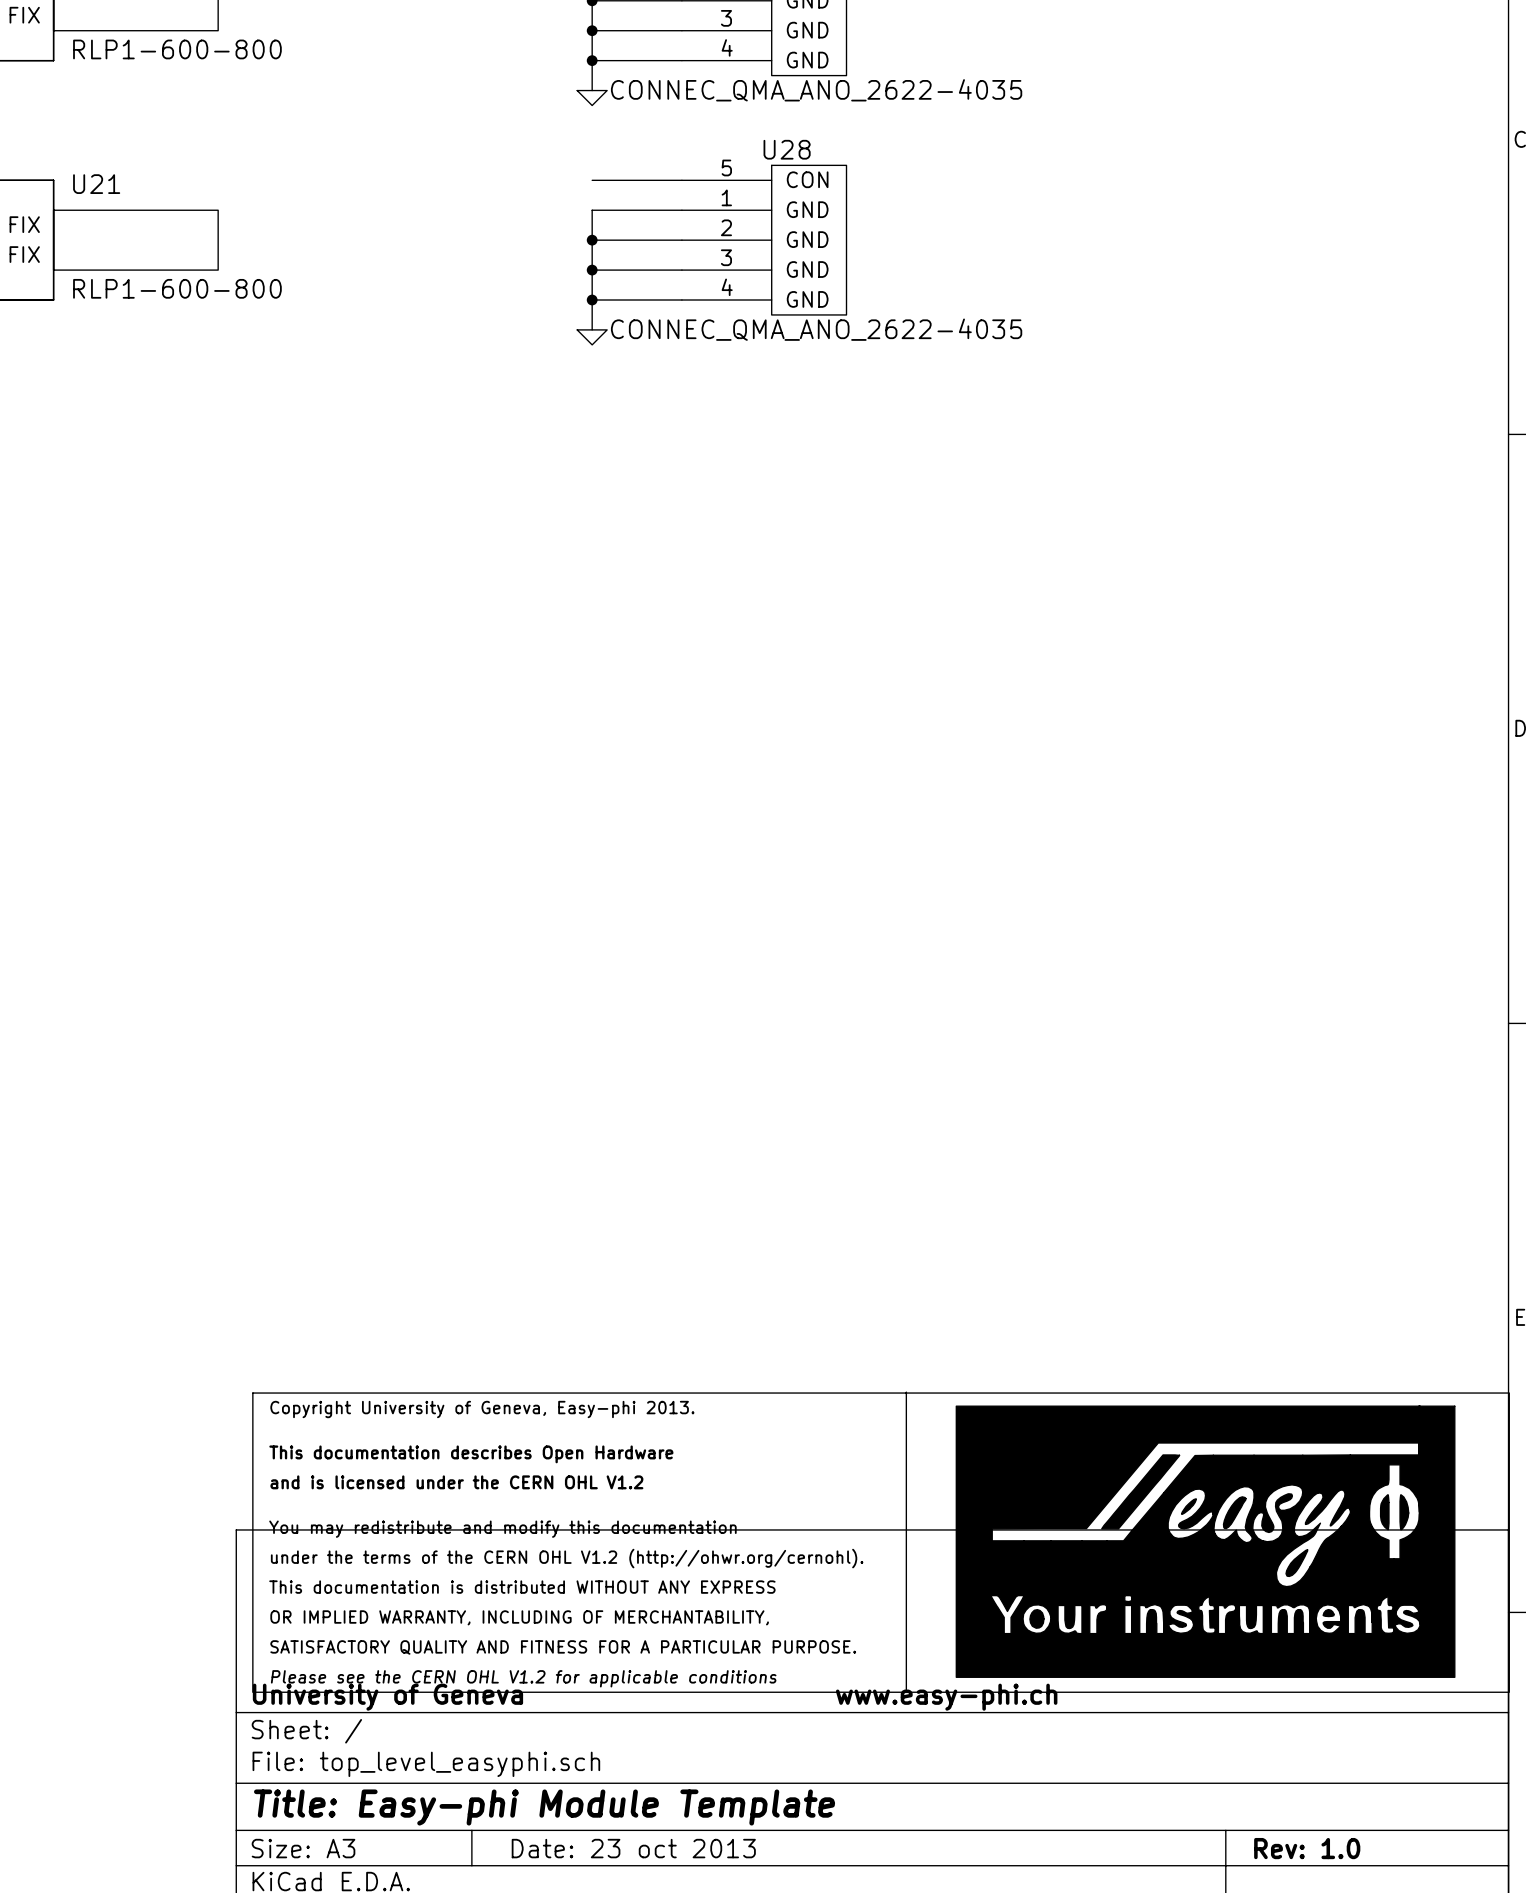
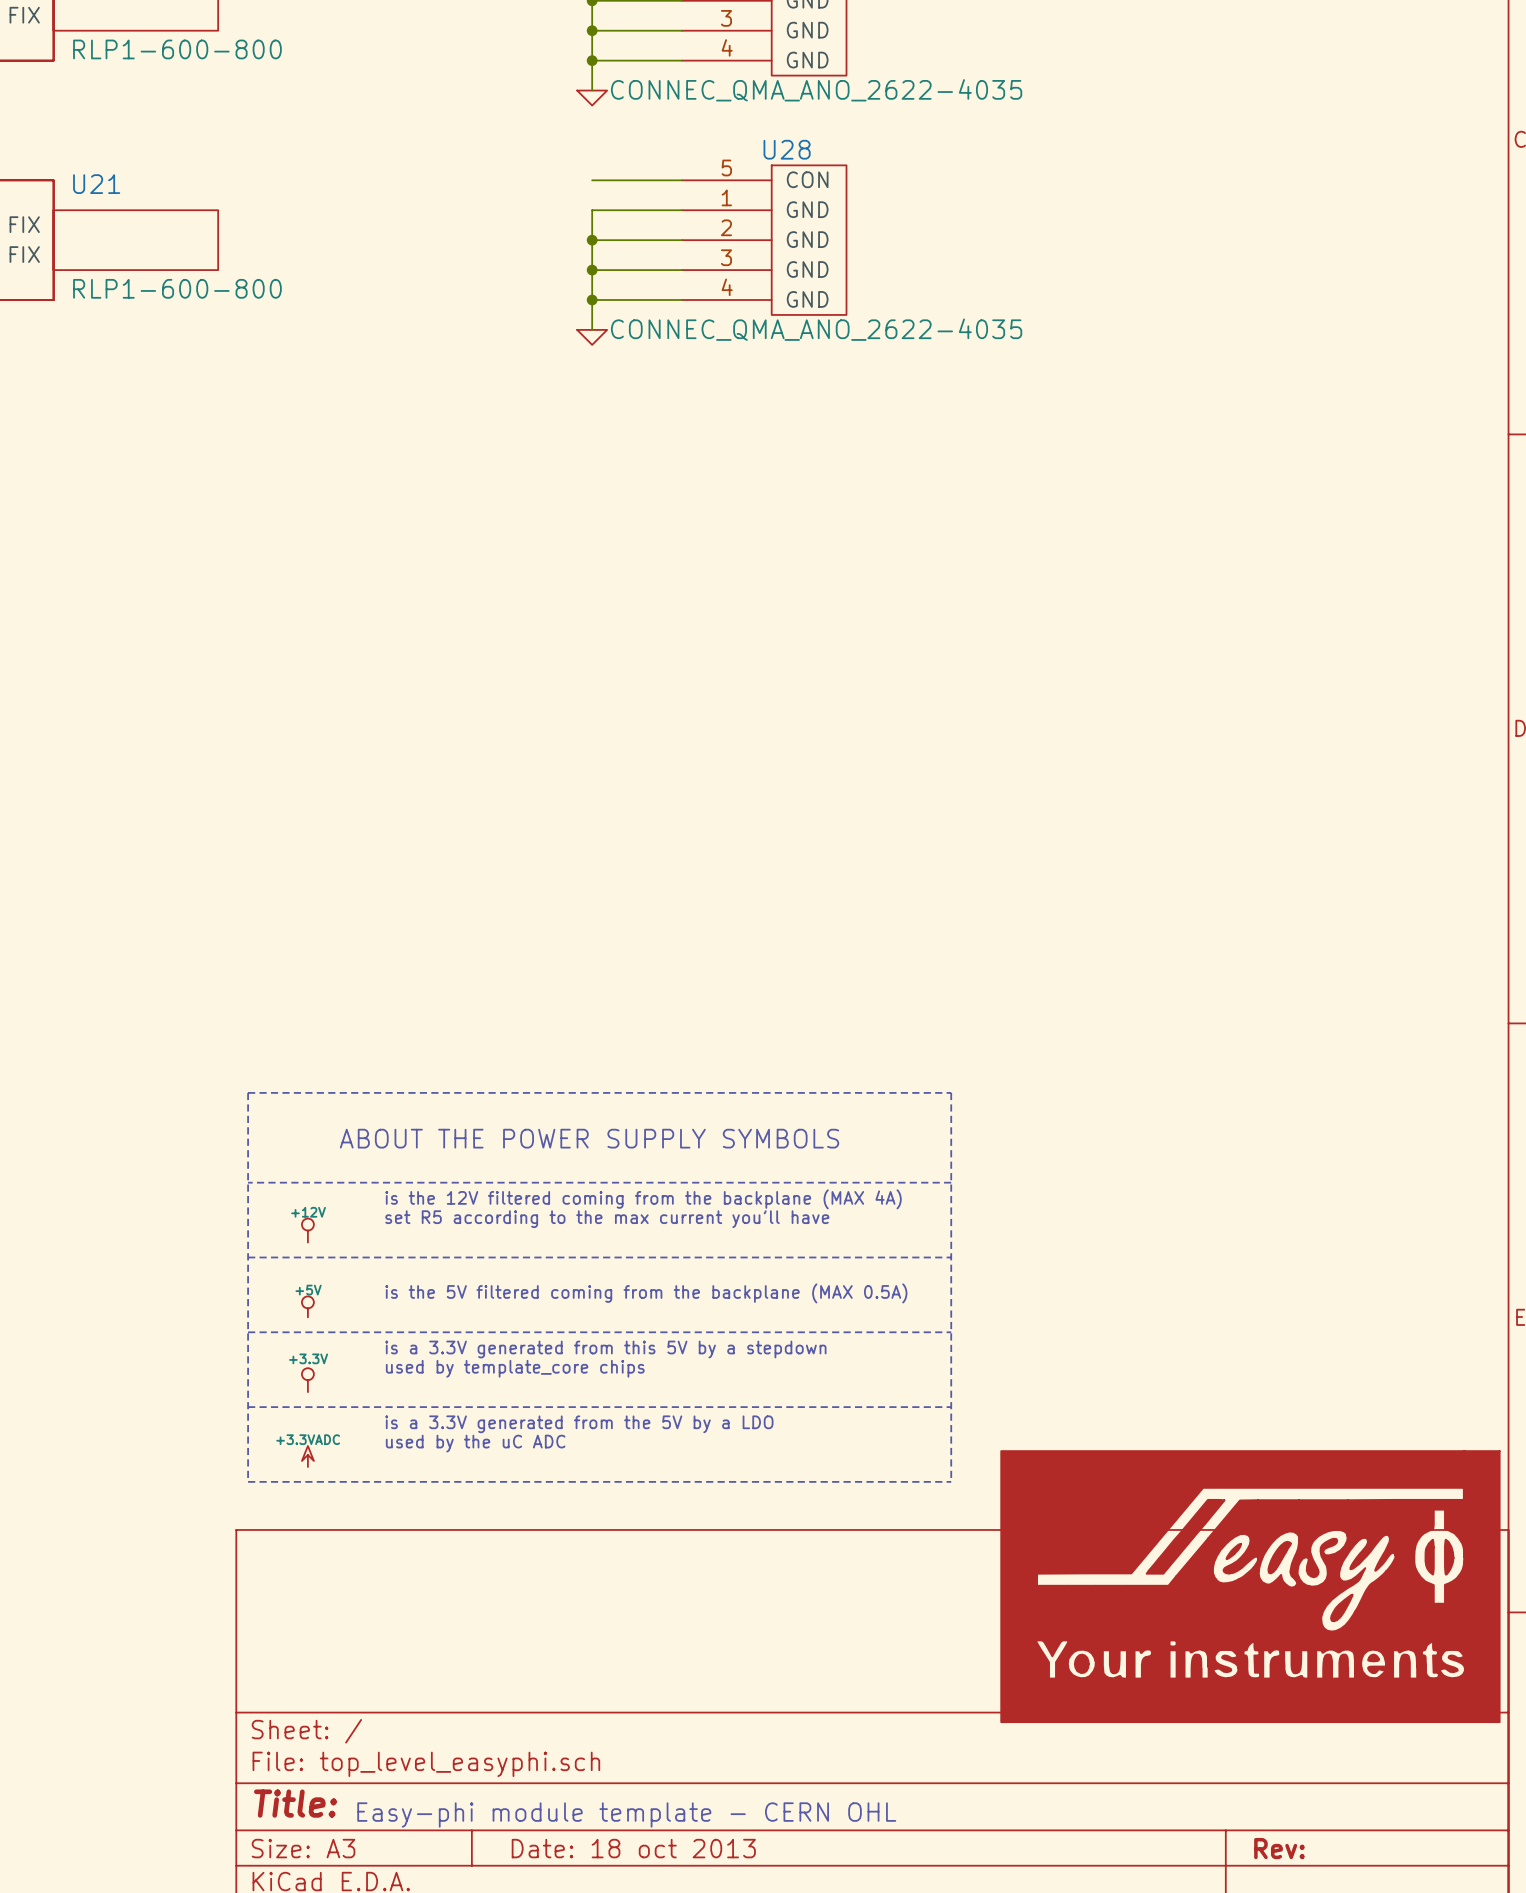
line: none -> (248, 1092) (951, 1092) (951, 1481) (248, 1481) (248, 1092)
text: none -> ABOUT THE POWER SUPPLY SYMBOLS (589, 1138)
line: none -> (248, 1182) (951, 1182)
text: none -> is the 12V filtered coming from the backplane (MAX 4A) (643, 1199)
text: none -> set R5 according to the max current you'll have (607, 1219)
power symbol: none -> +12V (307, 1230)
line: none -> (248, 1257) (951, 1257)
text: none -> is the 5V filtered coming from the backplane (MAX 0.5A) (646, 1293)
power symbol: none -> +5V (307, 1306)
line: none -> (248, 1332) (951, 1332)
text: none -> is a 3.3V generated from this 5V by a stepdown (605, 1349)
text: none -> used by template_core chips (515, 1368)
power symbol: none -> +3.3V (307, 1380)
line: none -> (248, 1407) (951, 1407)
text: none -> is a 3.3V generated from the 5V by a LDO (579, 1424)
text: none -> used by the uC ADC (475, 1443)
power symbol: none -> +3.3VADC (307, 1456)
part: (1205, 1541) -> none
part: (881, 1542) -> none
power symbol: none -> (1250, 1586)
title block: University of Geneva www.easy-phi.ch (655, 1697) -> none
title block: Title: Easy-phi Module Template (544, 1807) -> Title: (295, 1803)
text: none -> Easy-phi module template - CERN OHL (626, 1815)
title block: Date: 23 oct 2013 (633, 1848) -> Date: 18 oct 2013 (633, 1848)
title block: Rev: 1.0 (1307, 1848) -> Rev: (1279, 1848)

